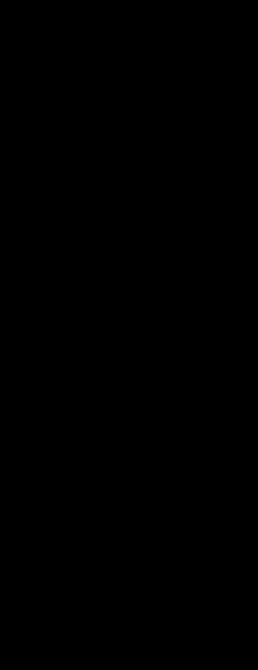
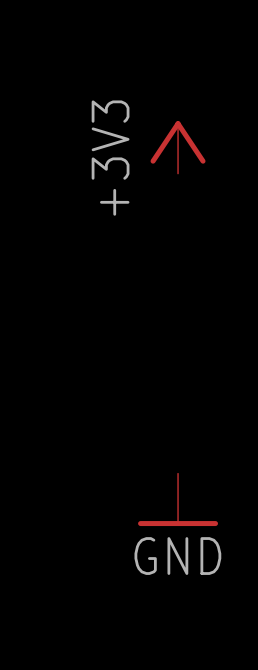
power symbol: none -> +3V3 (178, 147)
power symbol: none -> GND (178, 499)

